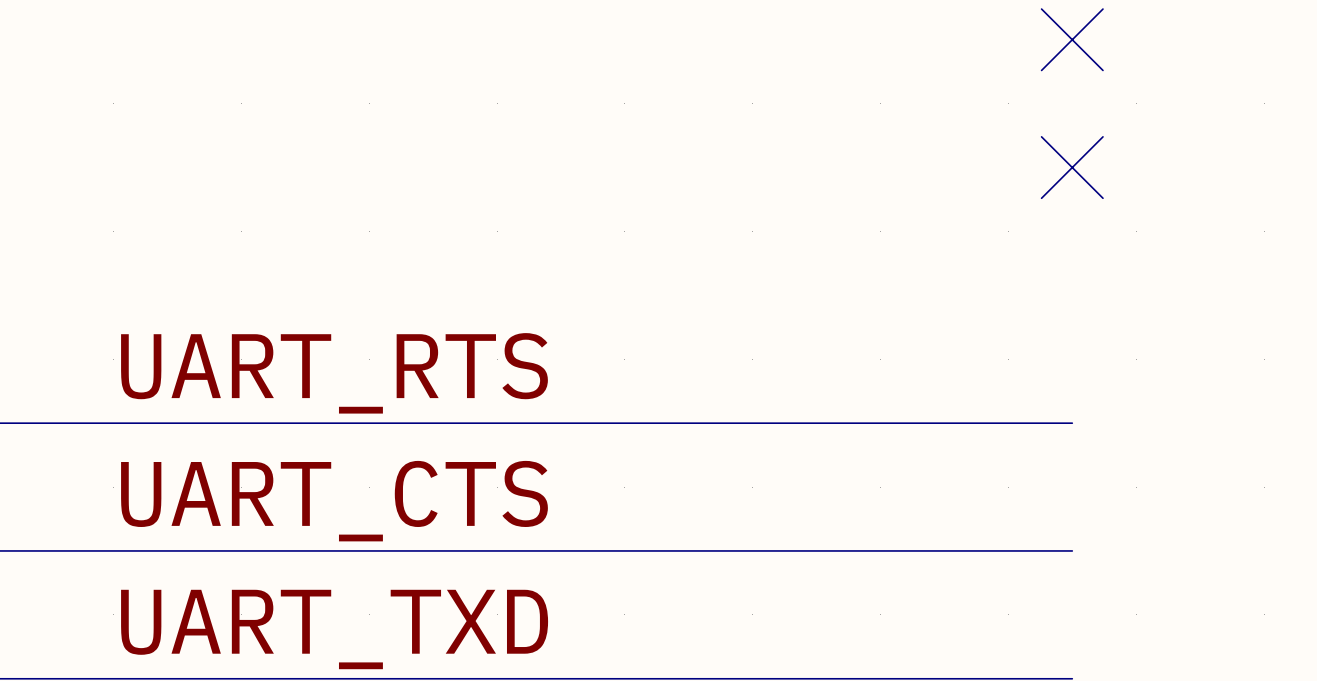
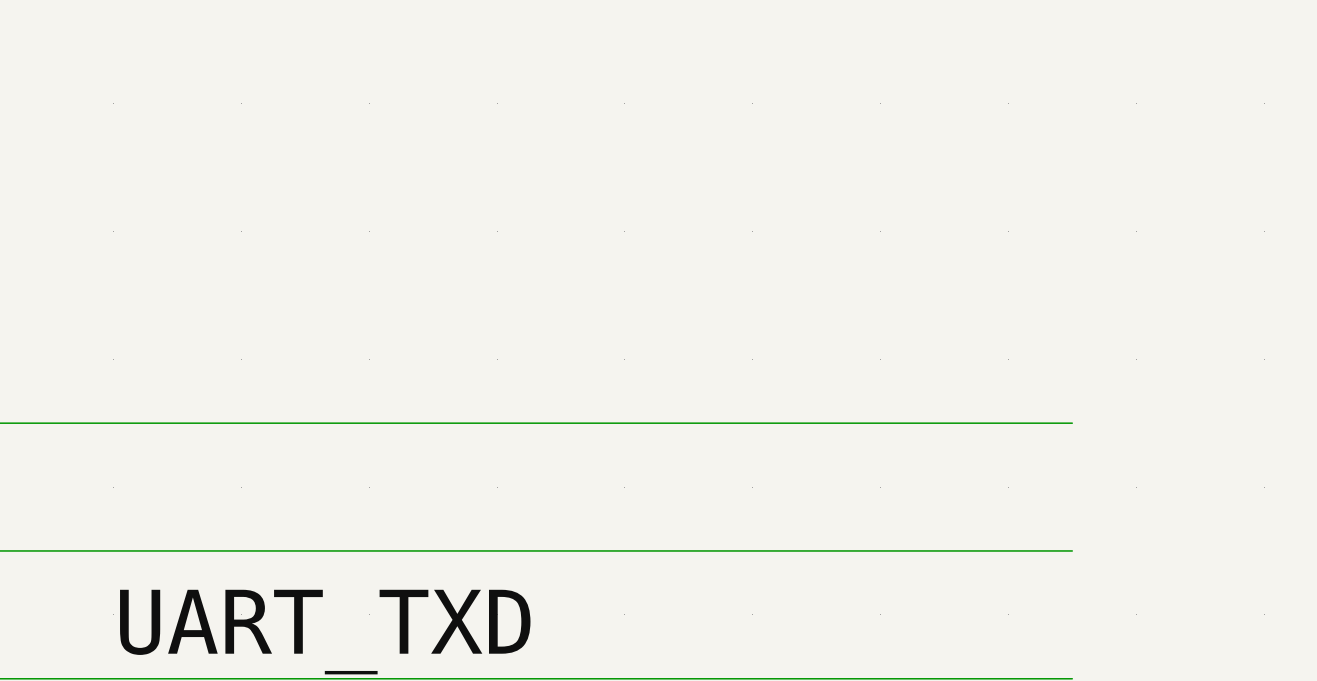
no-connect mark: (1072, 39) -> none
no-connect mark: (1072, 167) -> none
label: UART_RTS (334, 373) -> none
label: UART_CTS (334, 501) -> none

